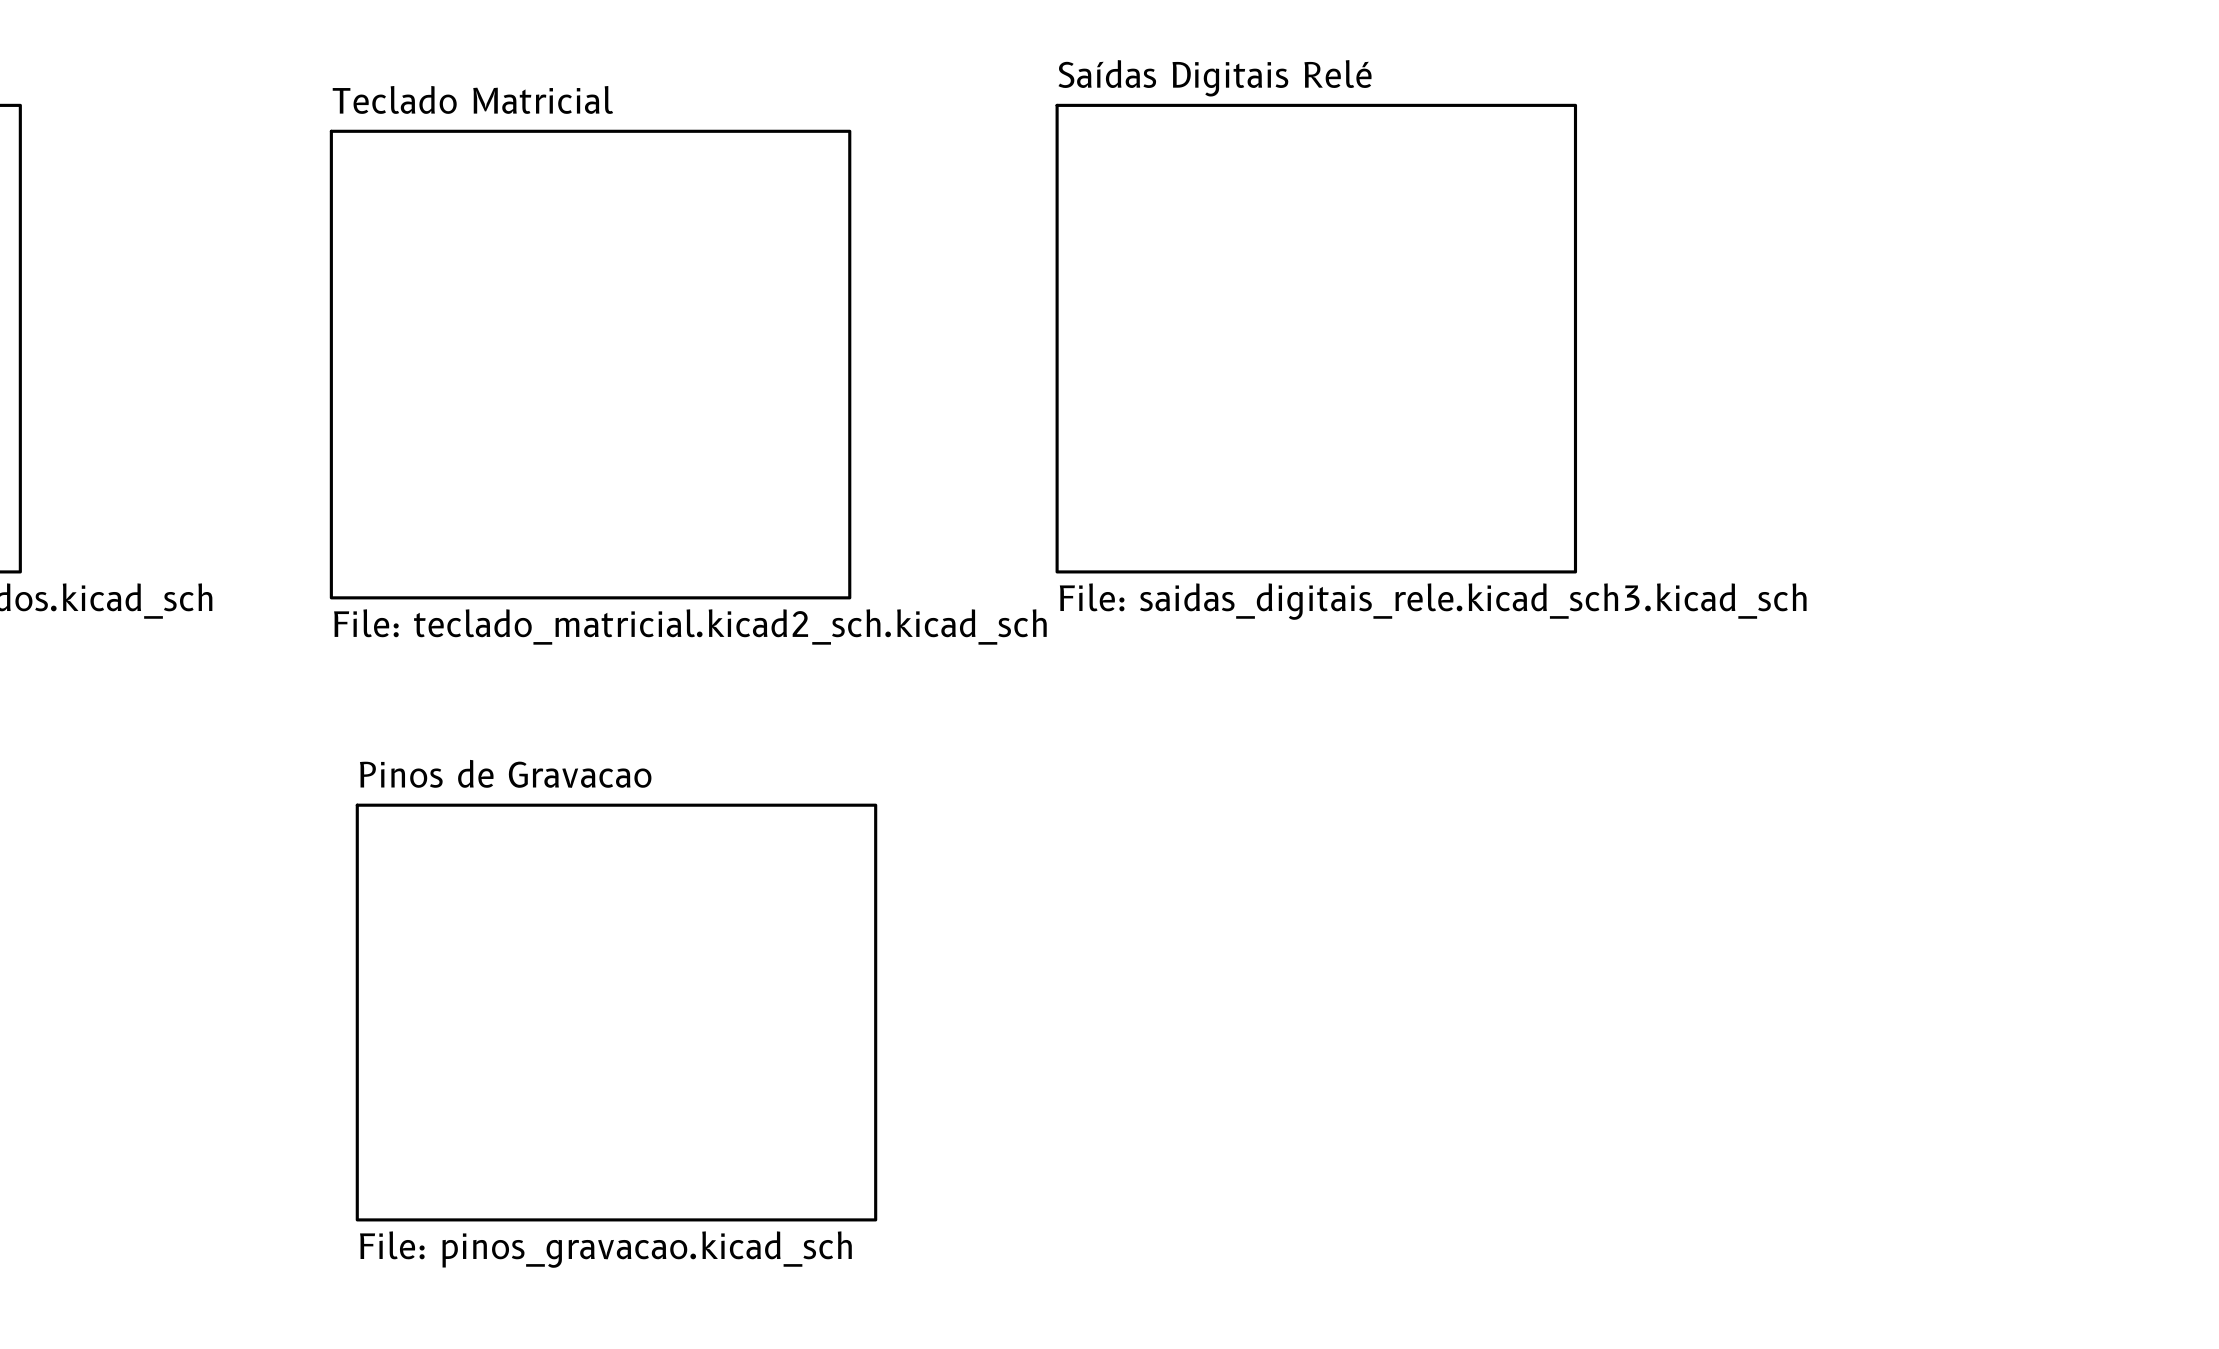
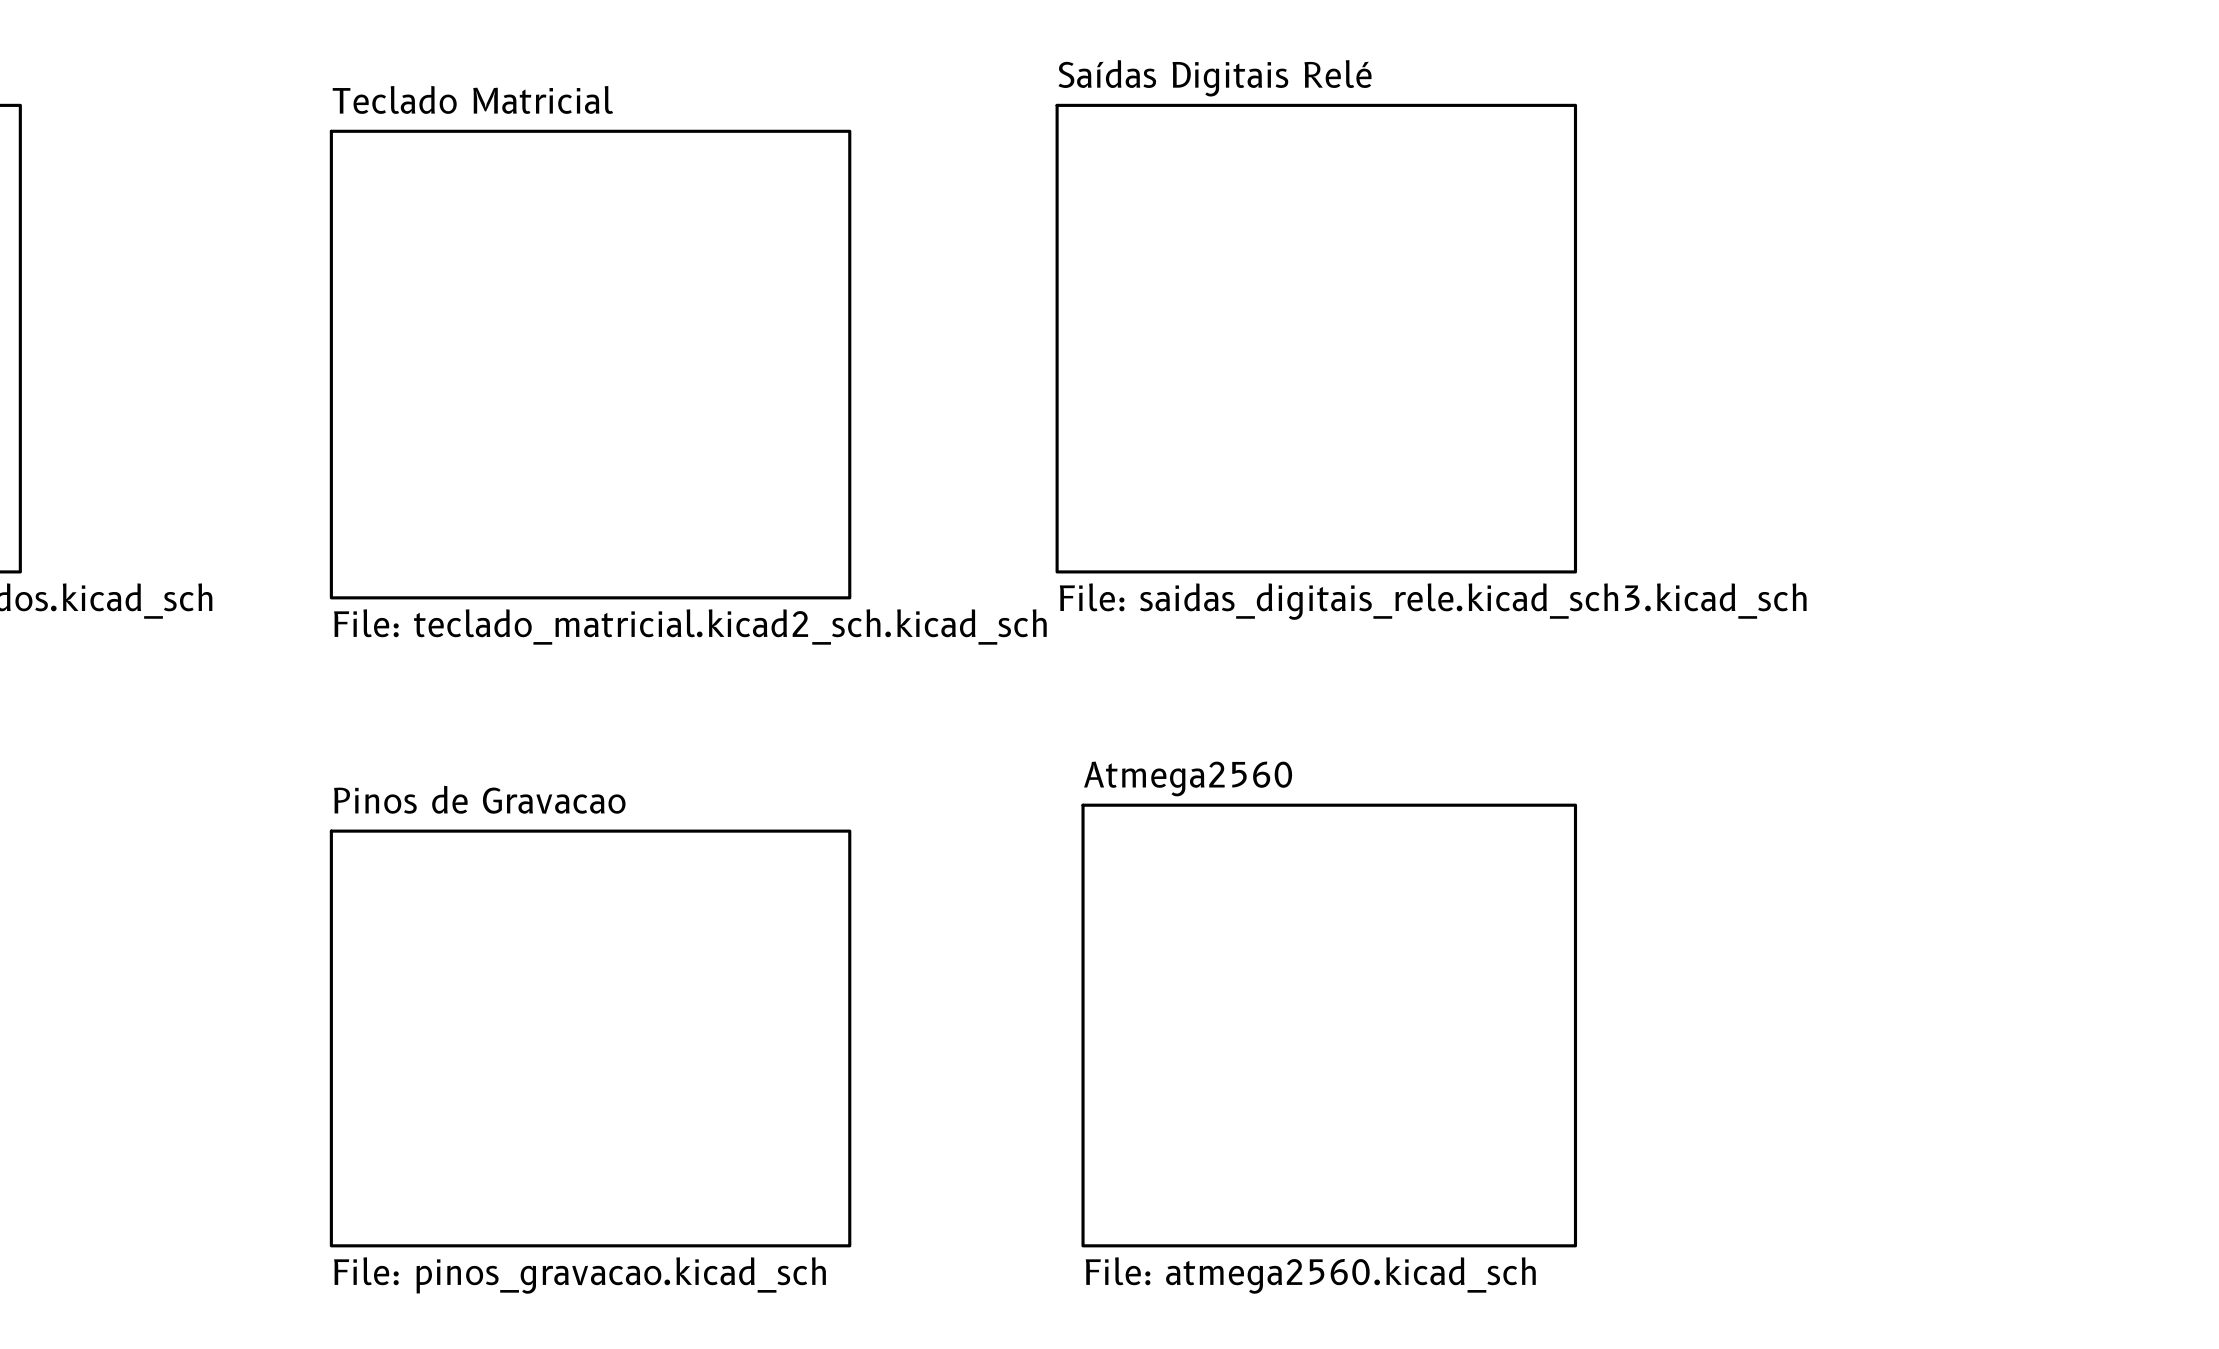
sheet Pinos de Gravacao position: (616, 1012) -> (590, 1038)
sheet Atmega2560: none -> File: atmega2560.kicad_sch (1329, 1025)

